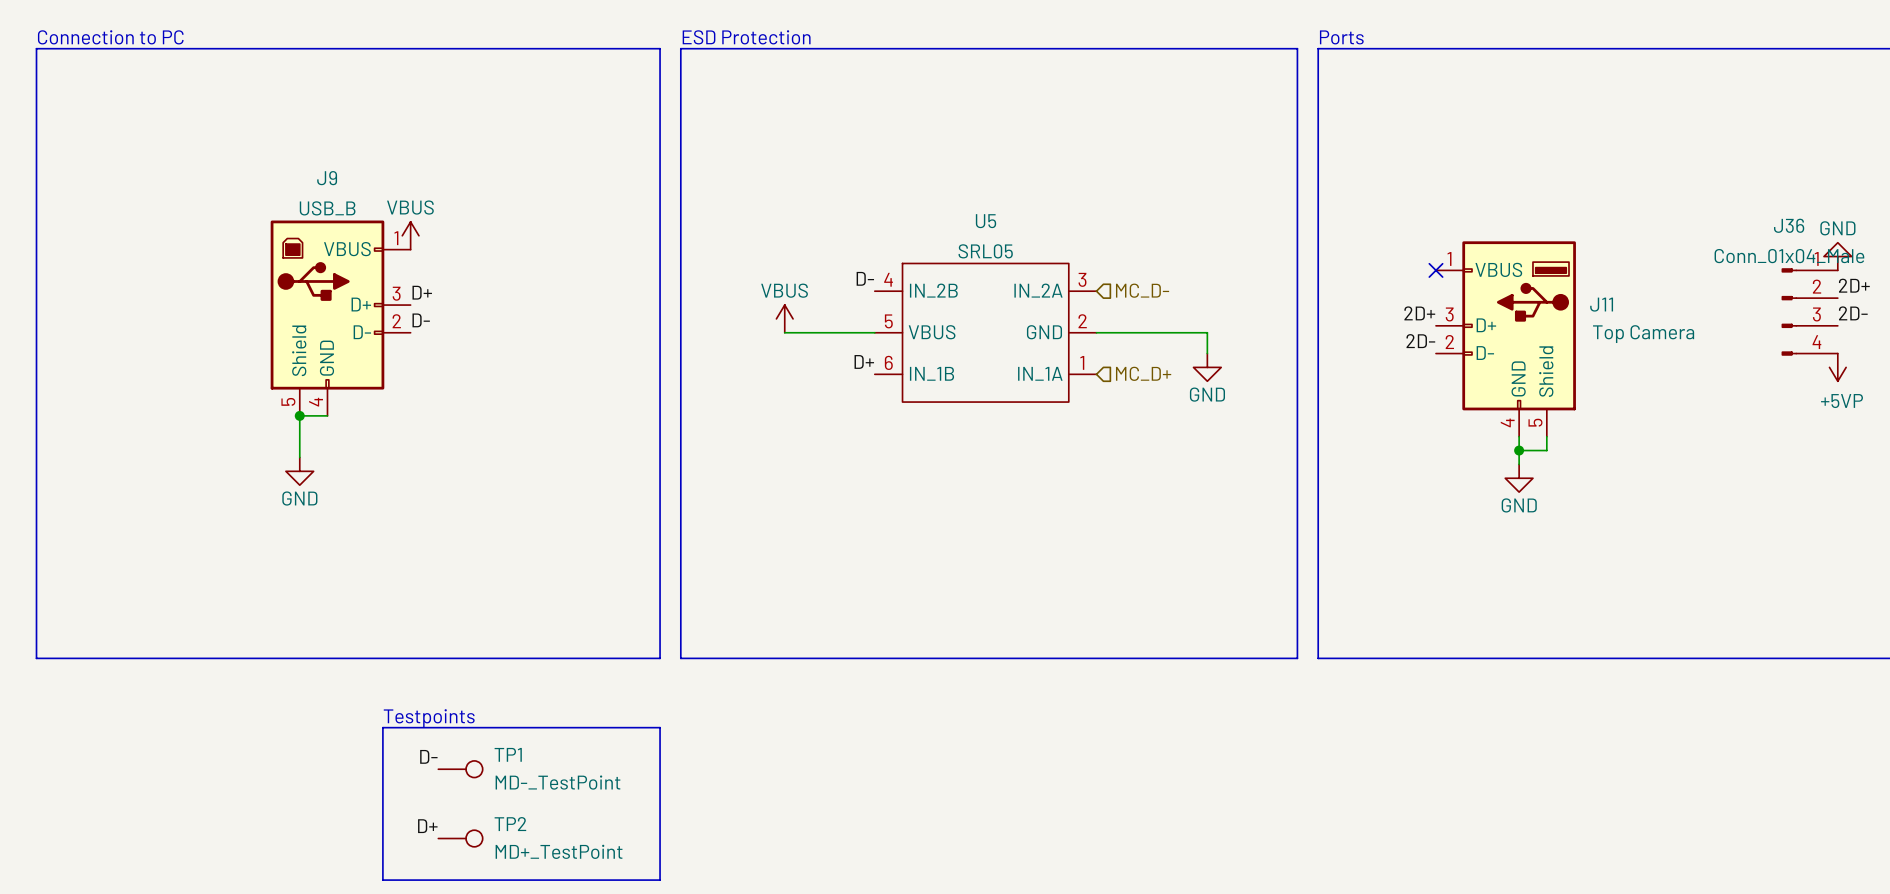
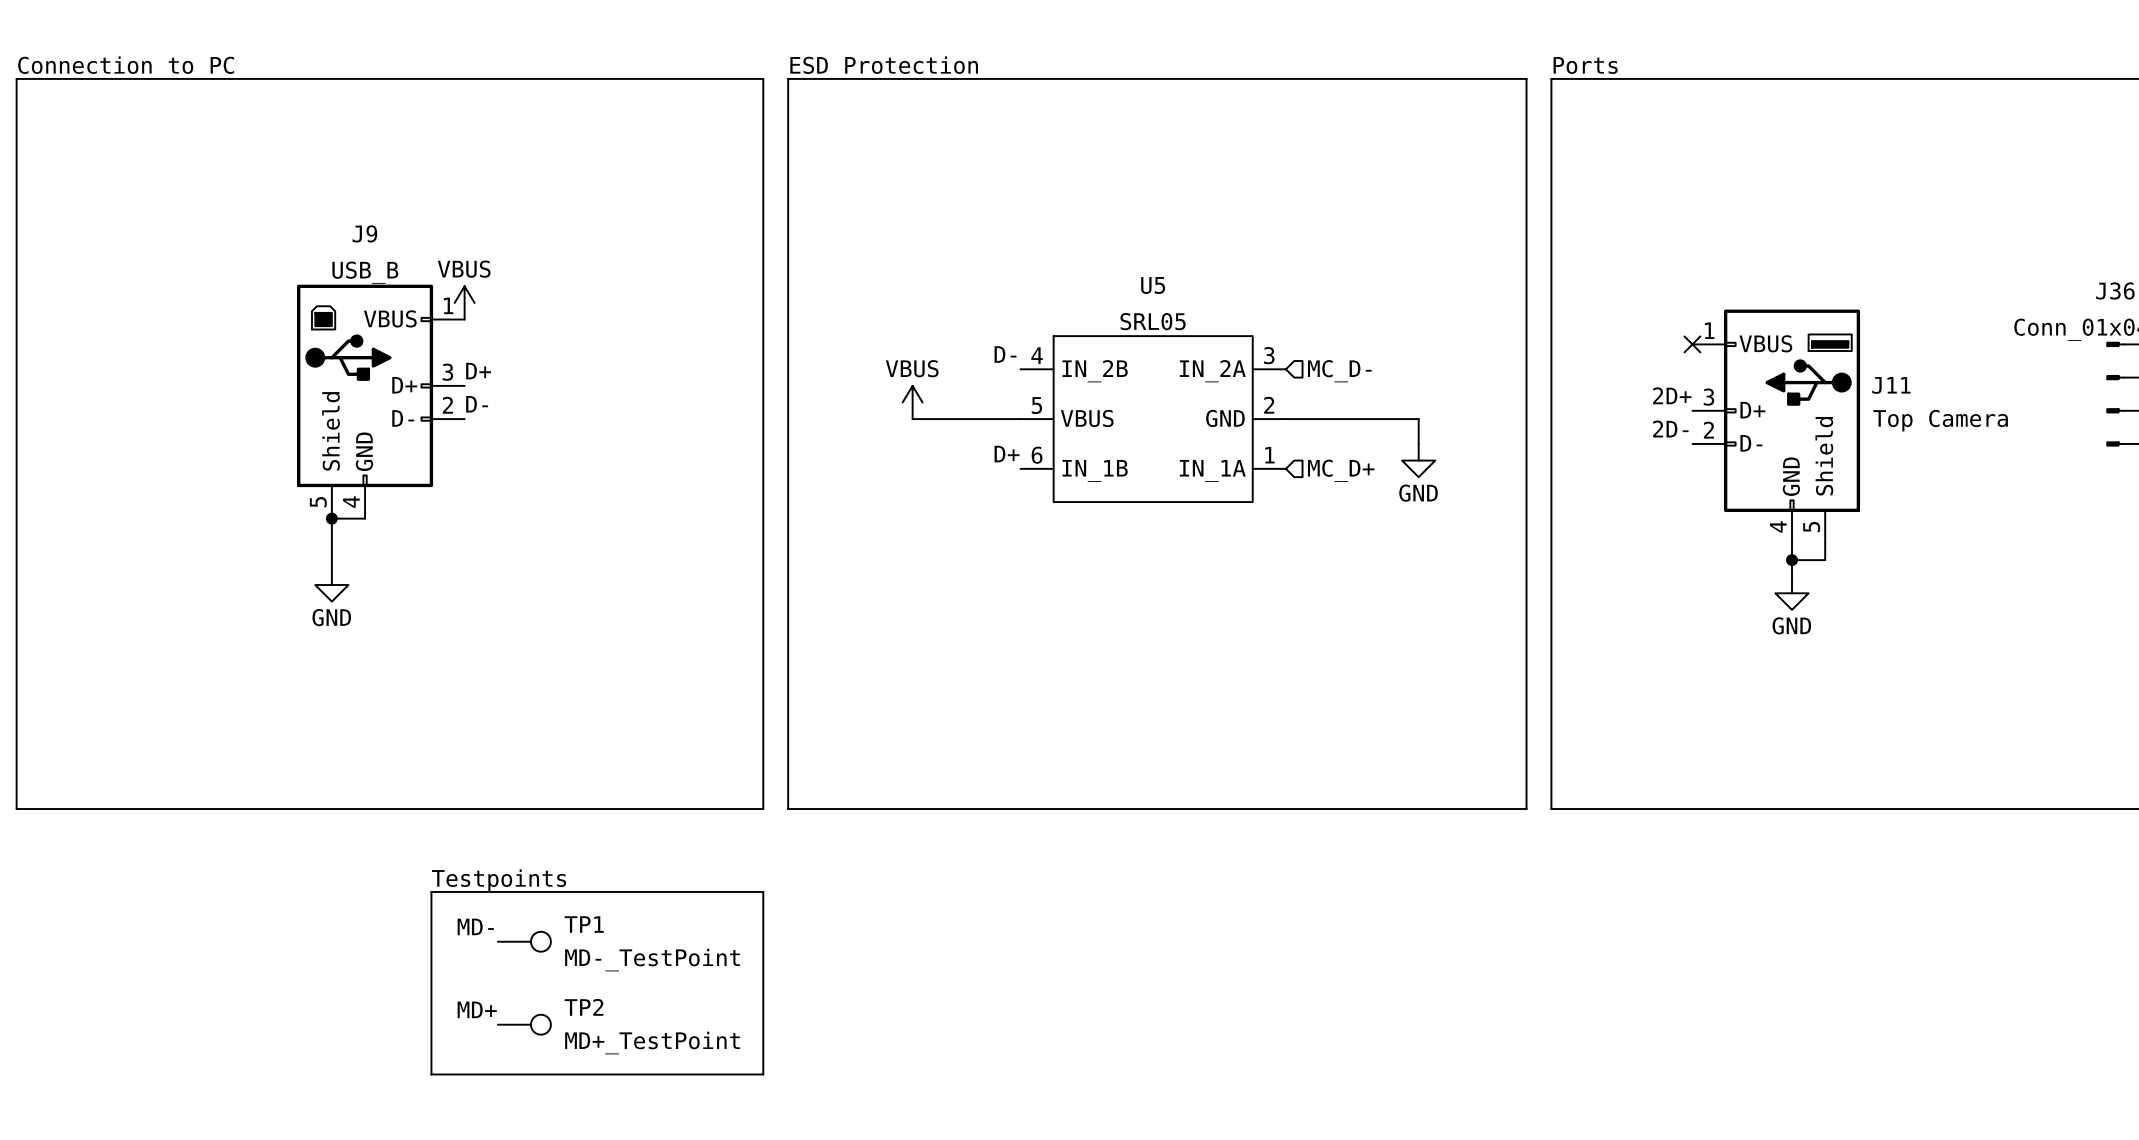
label: D- (428, 756) -> MD- (475, 926)
label: D+ (427, 826) -> MD+ (477, 1009)

